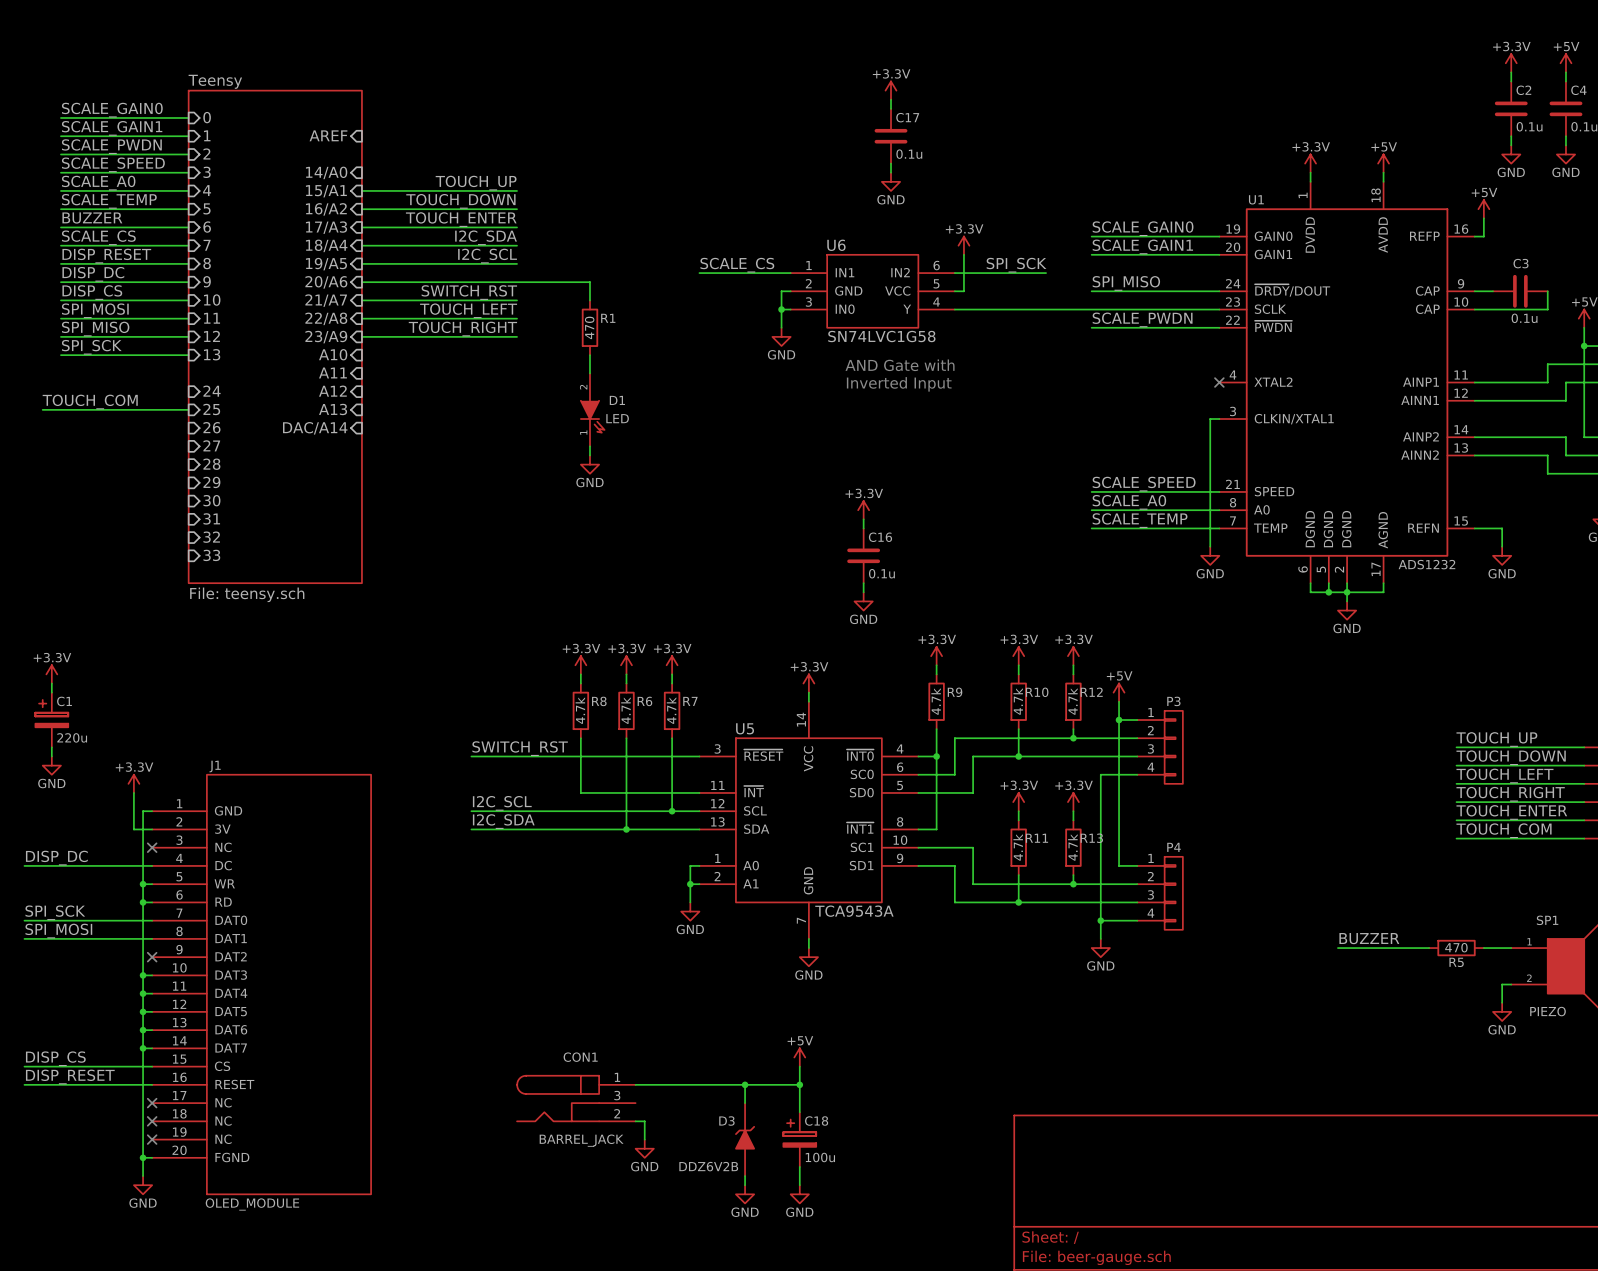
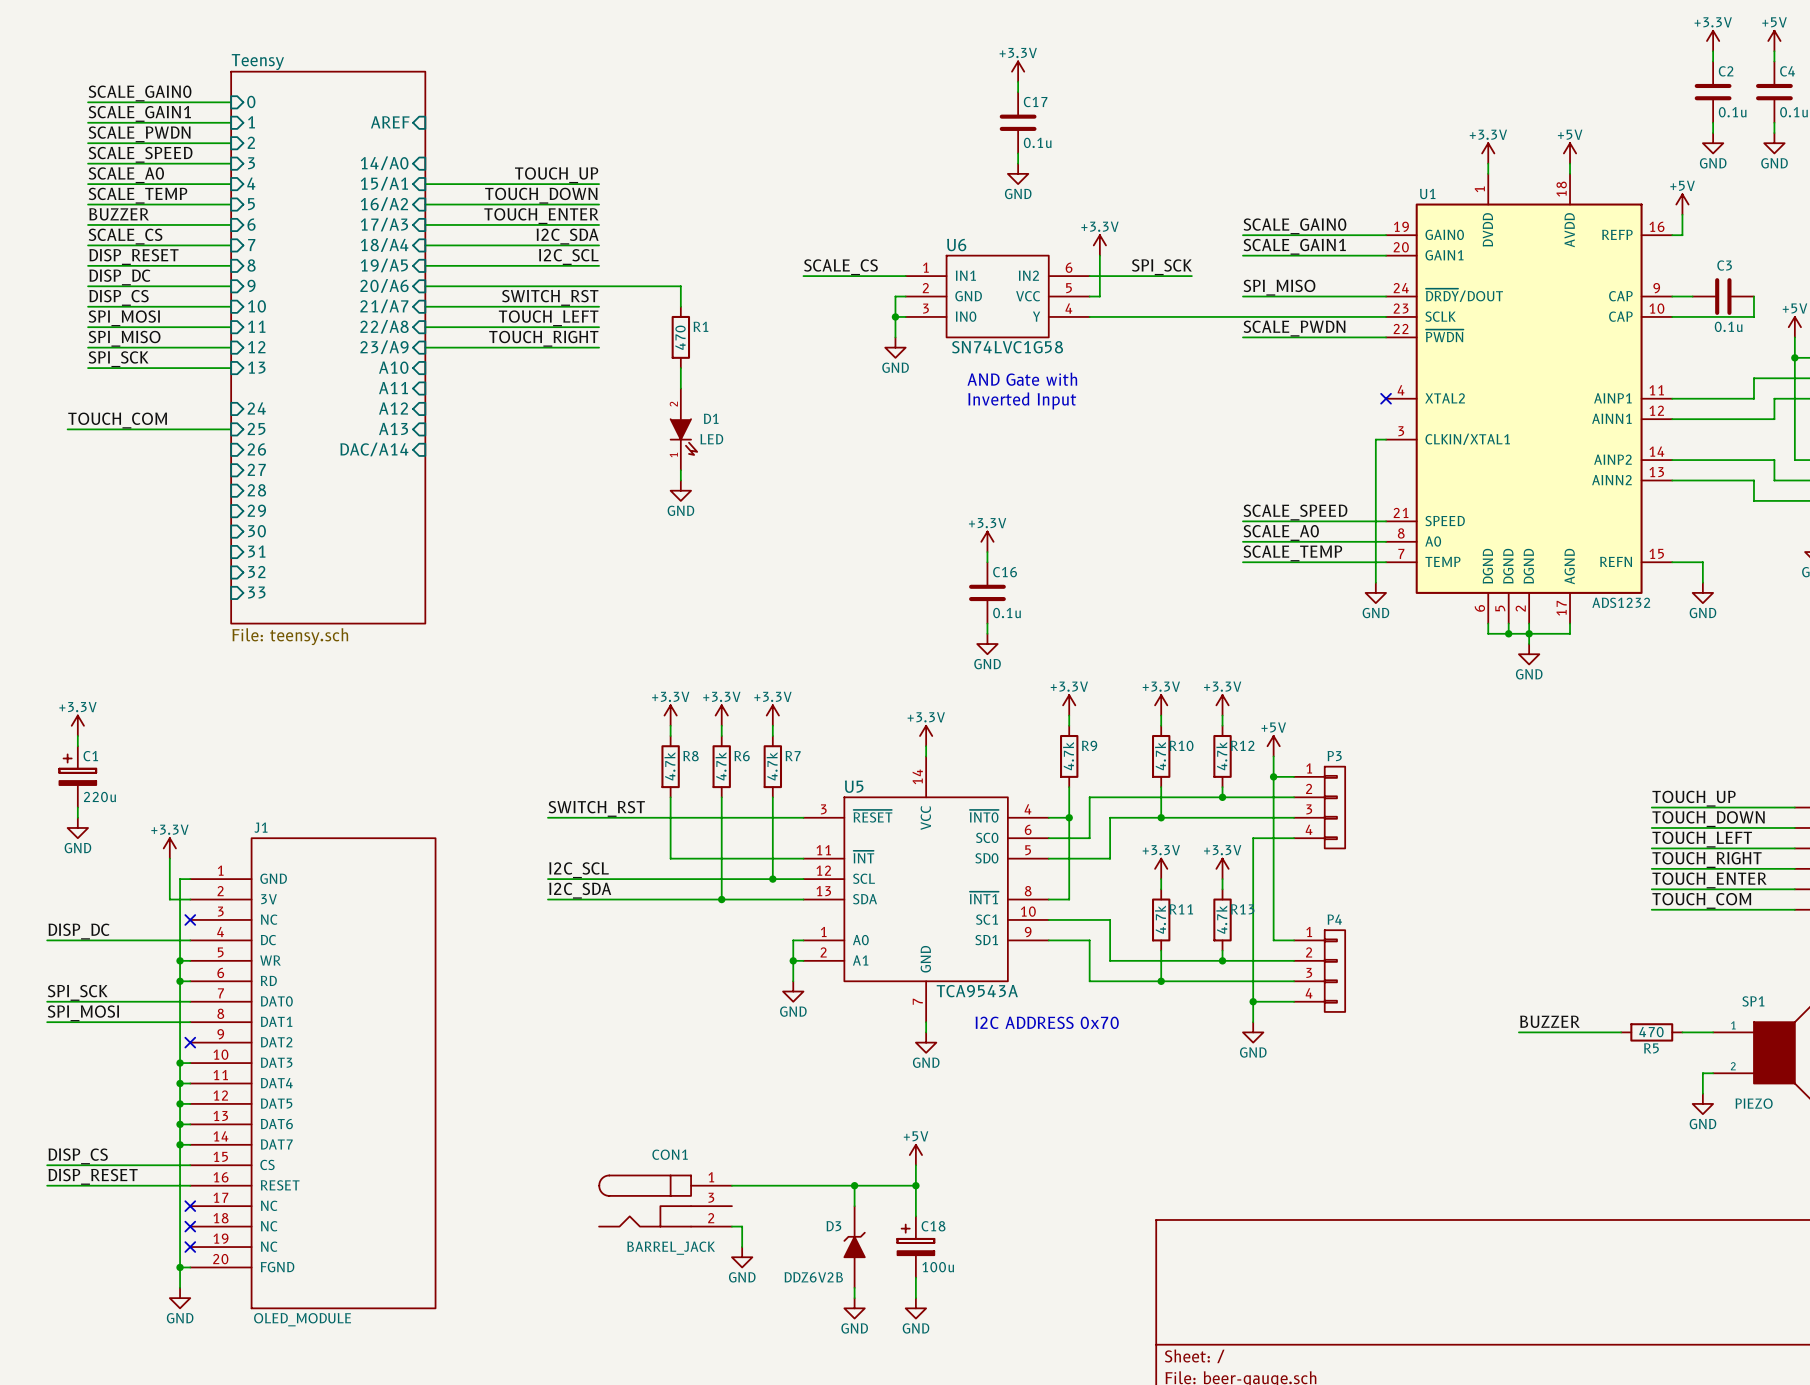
text: none -> I2C ADDRESS 0x70 (1047, 1022)

